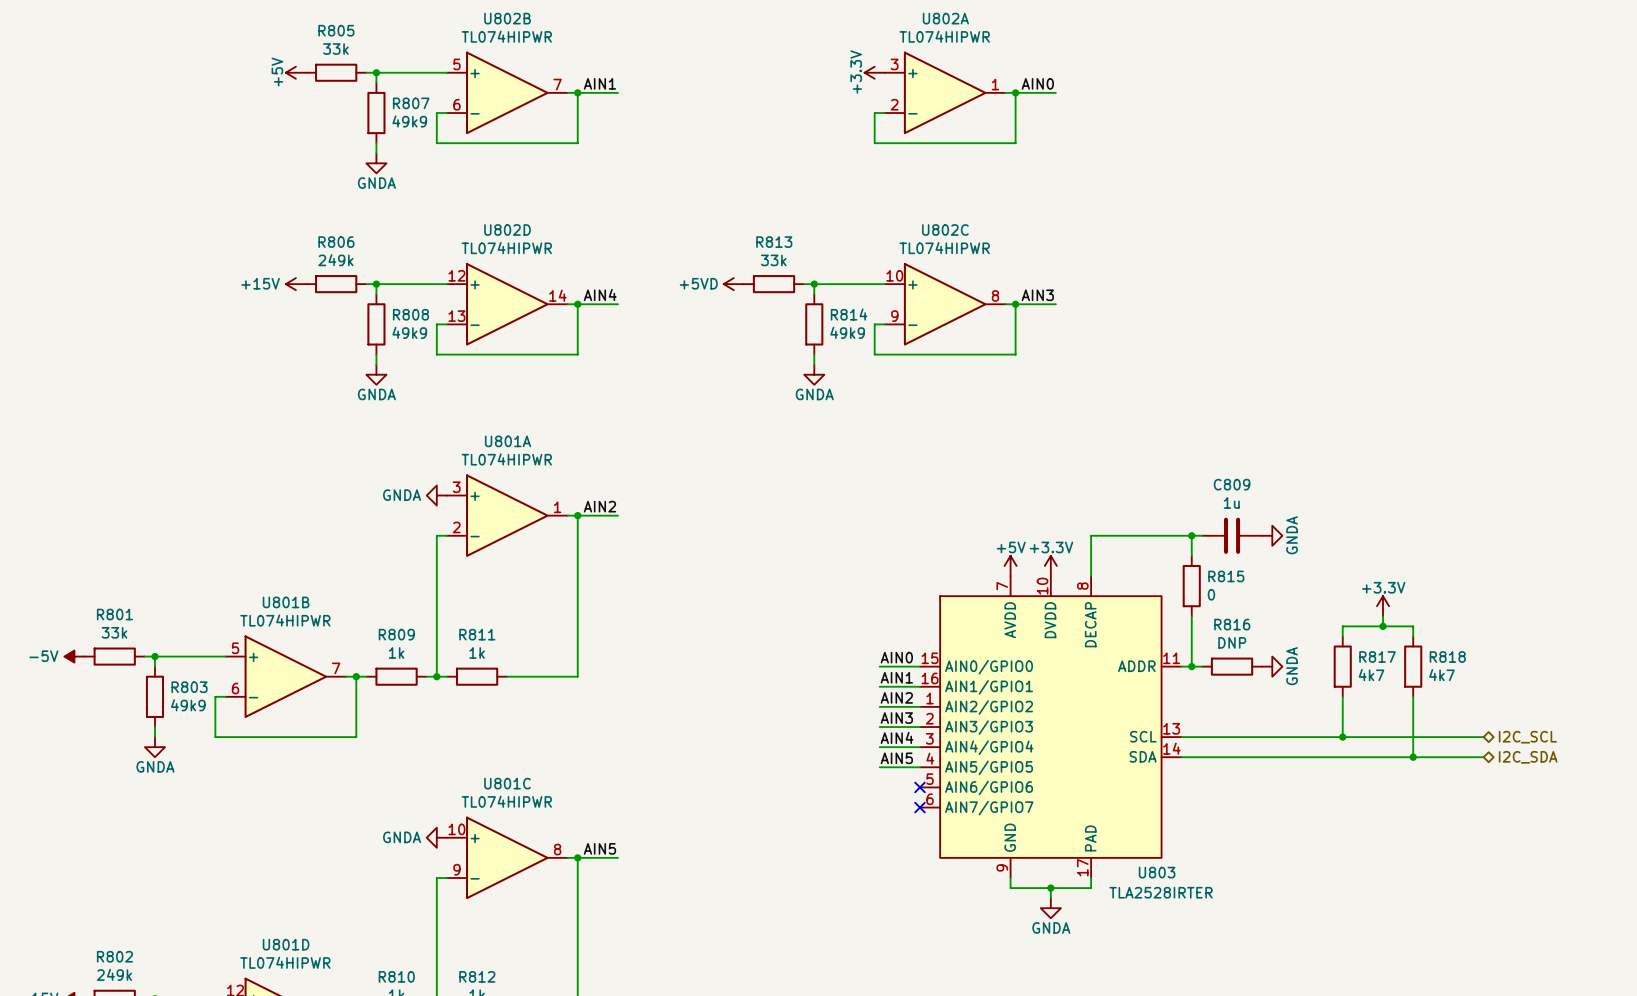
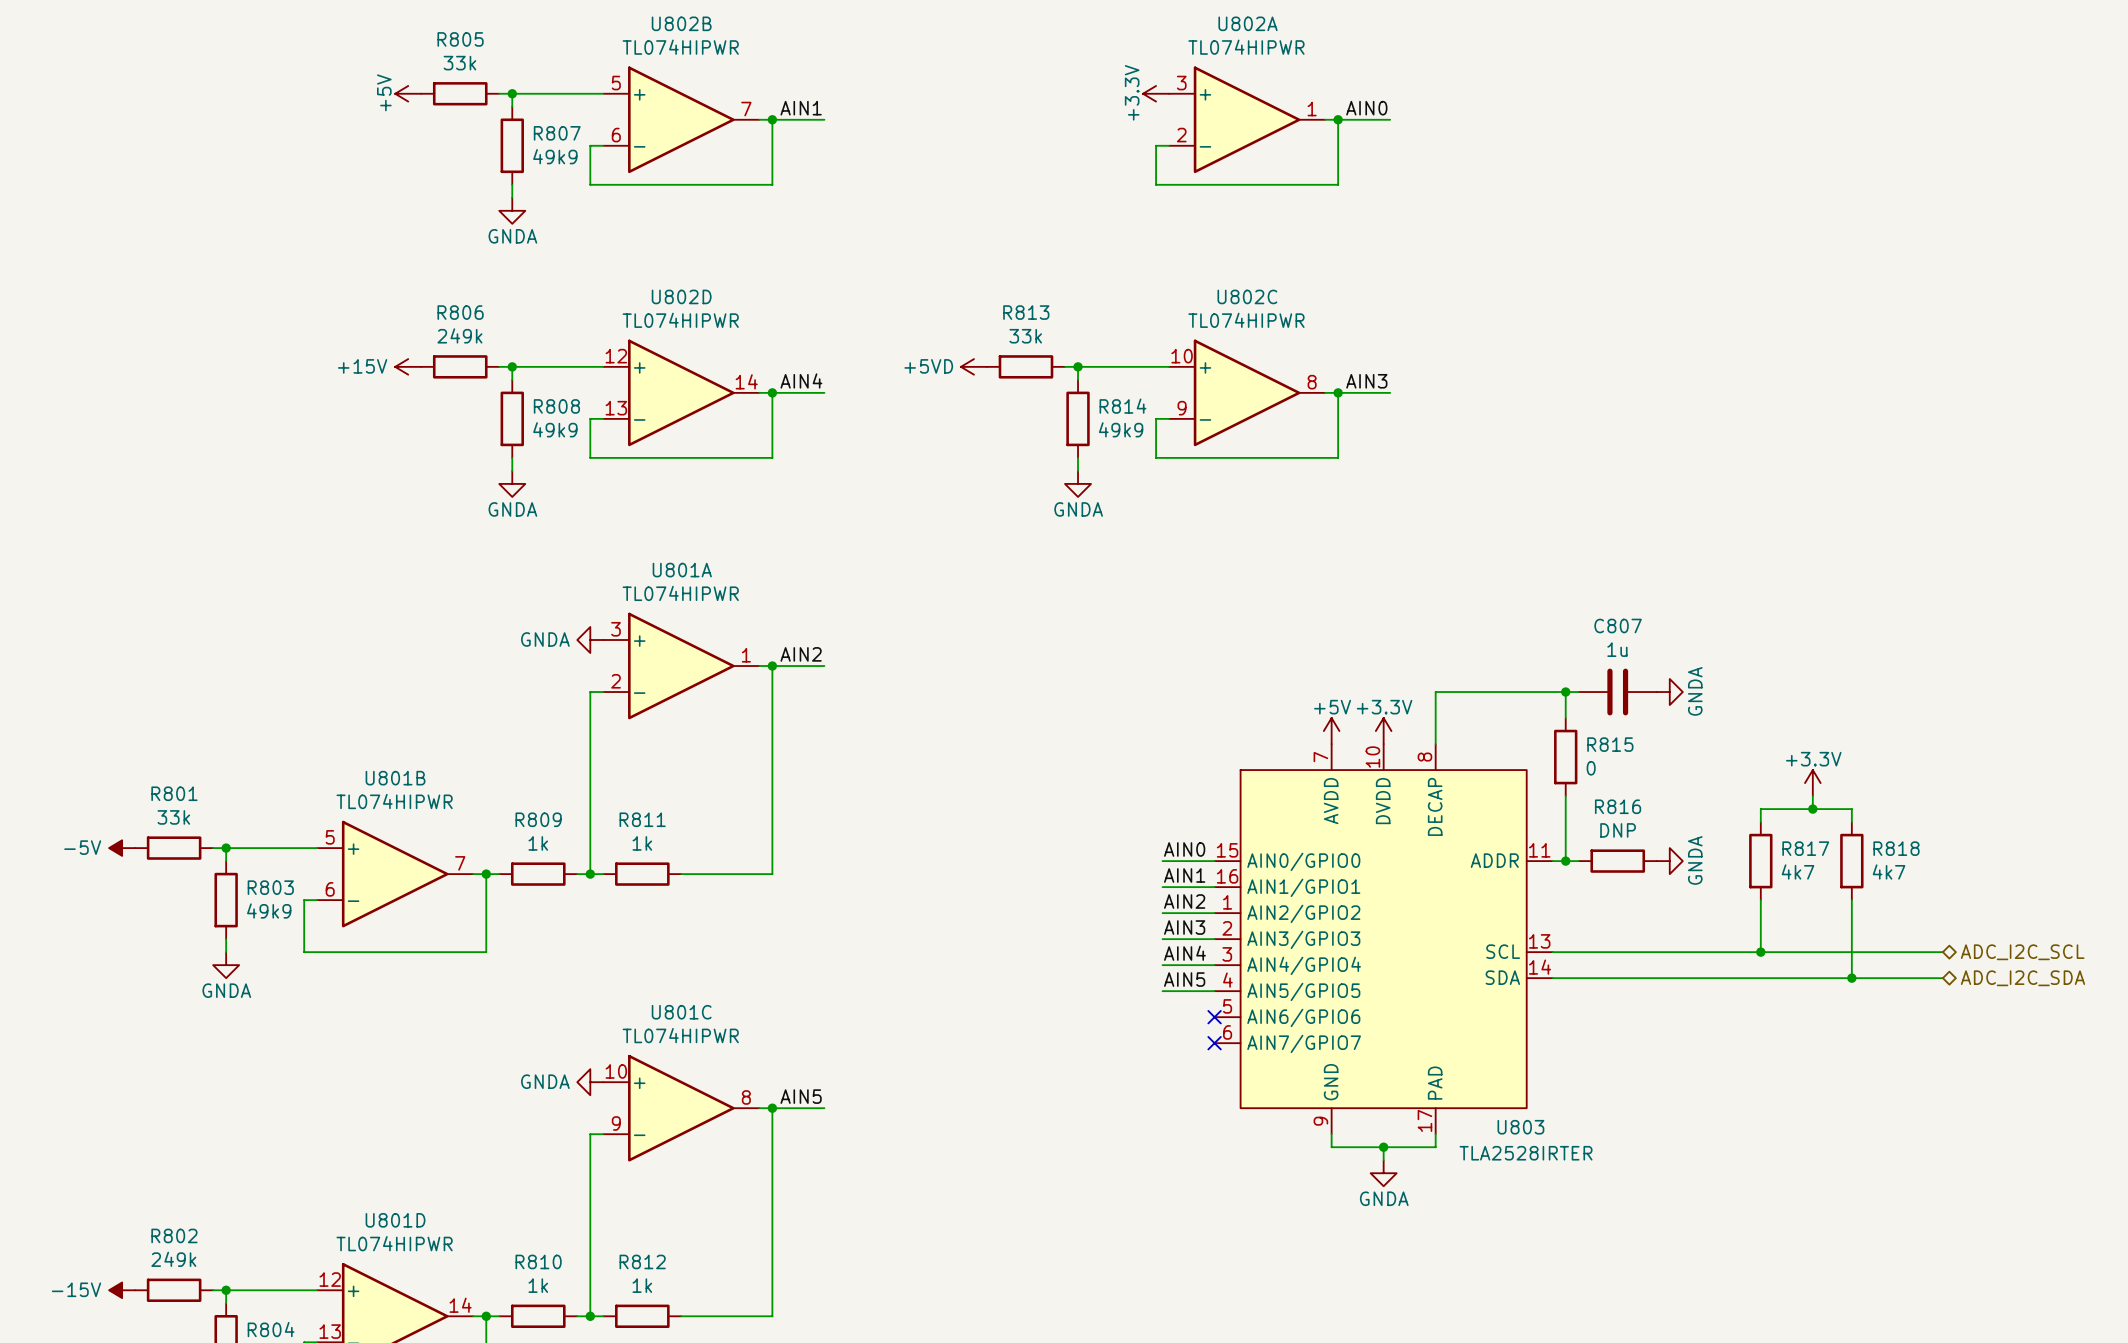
C809 name: C809 (1232, 484) -> C807 (1618, 625)
hierarchical label: I2C_SCL (1527, 737) -> ADC_I2C_SCL (2022, 952)
hierarchical label: I2C_SDA (1528, 757) -> ADC_I2C_SDA (2022, 978)

